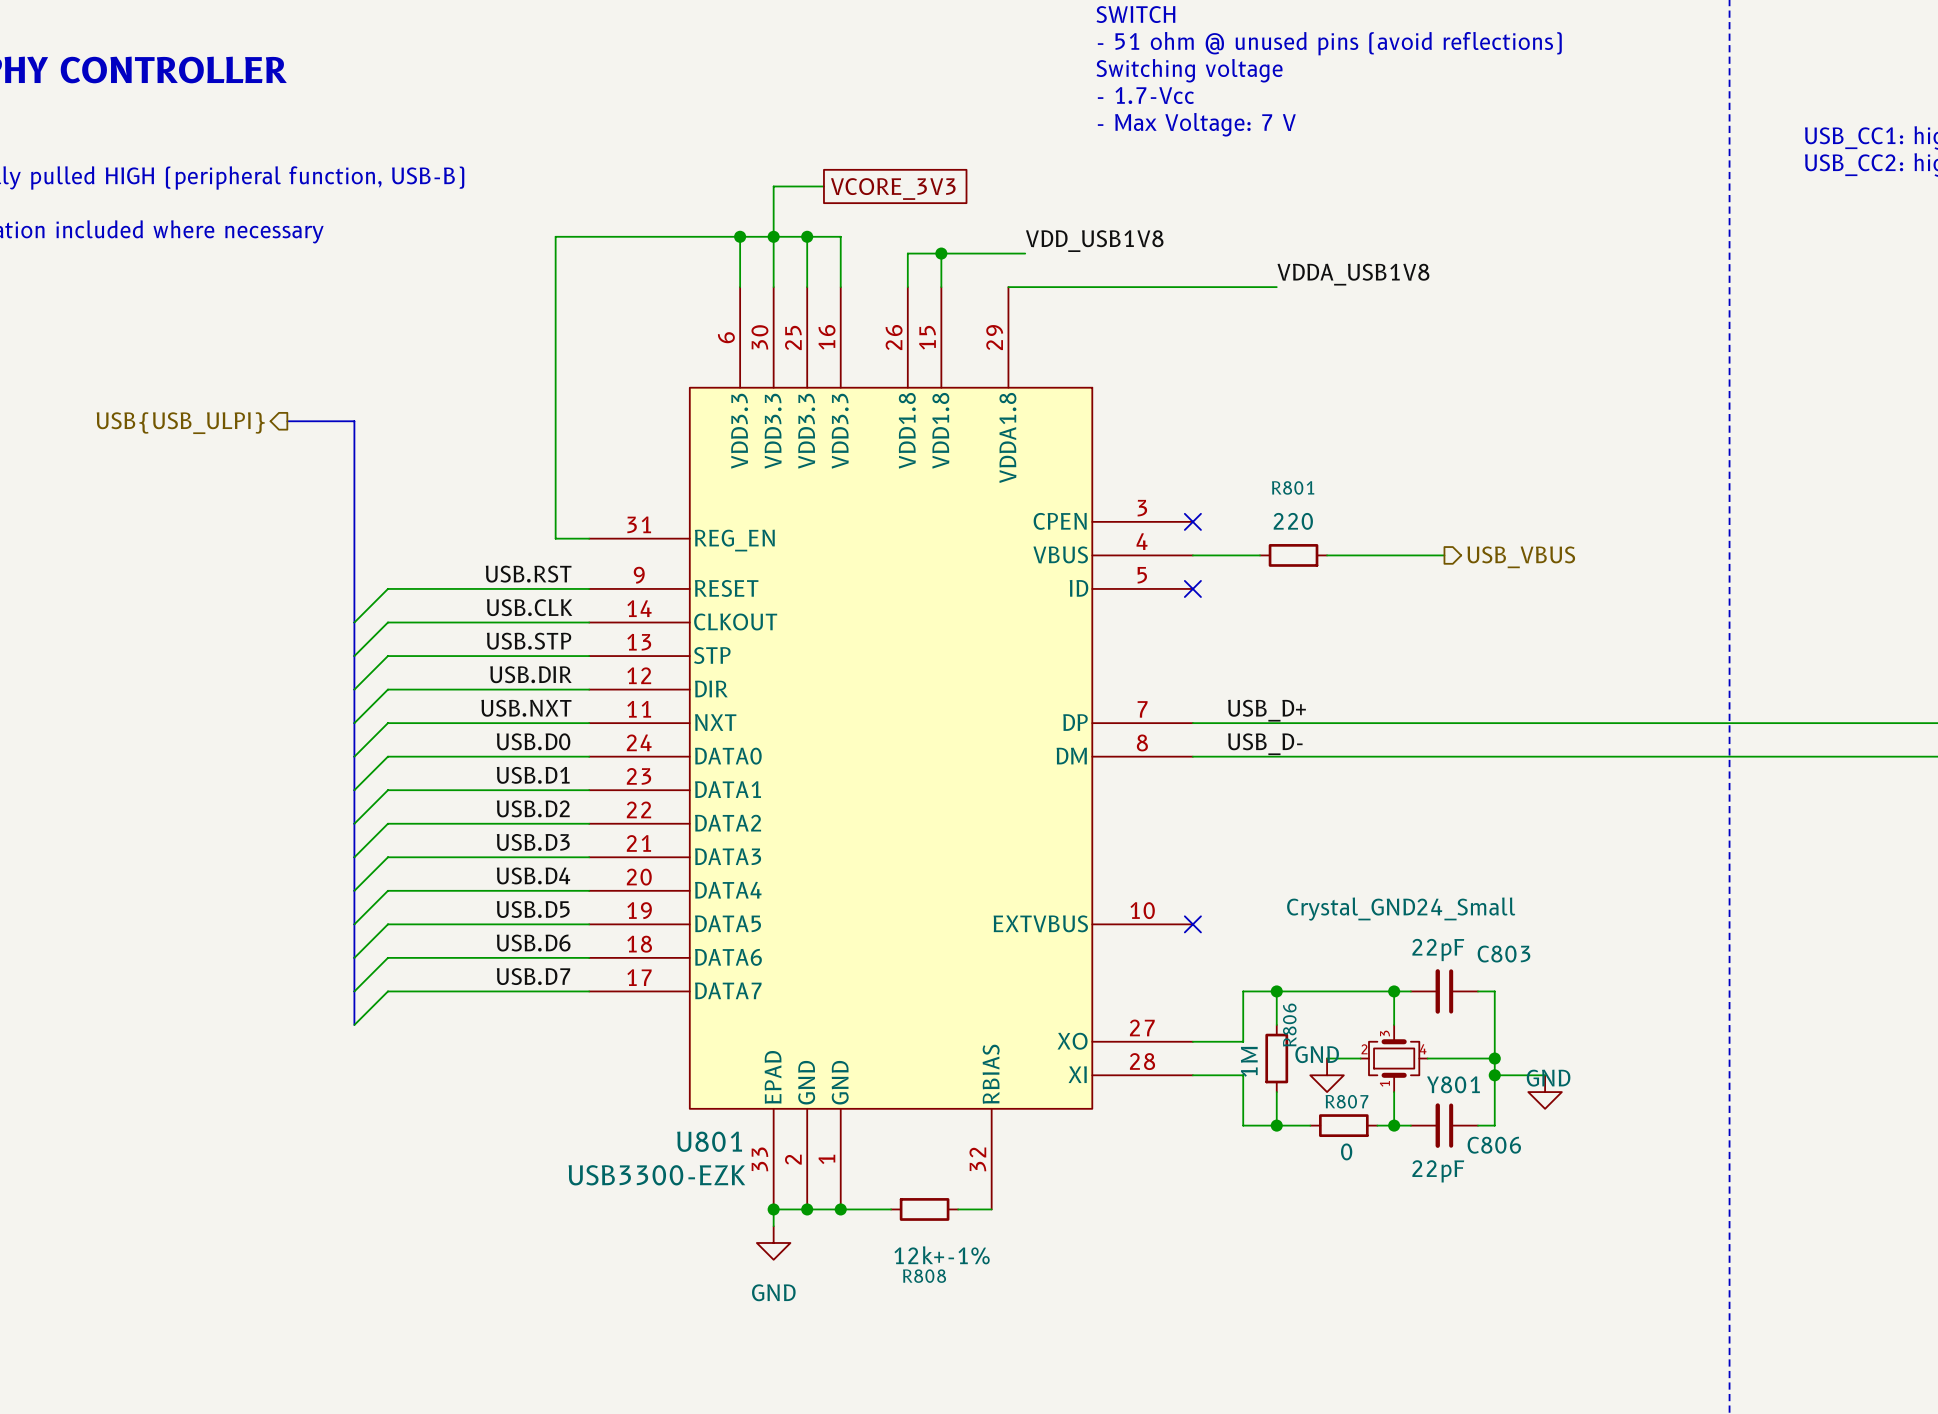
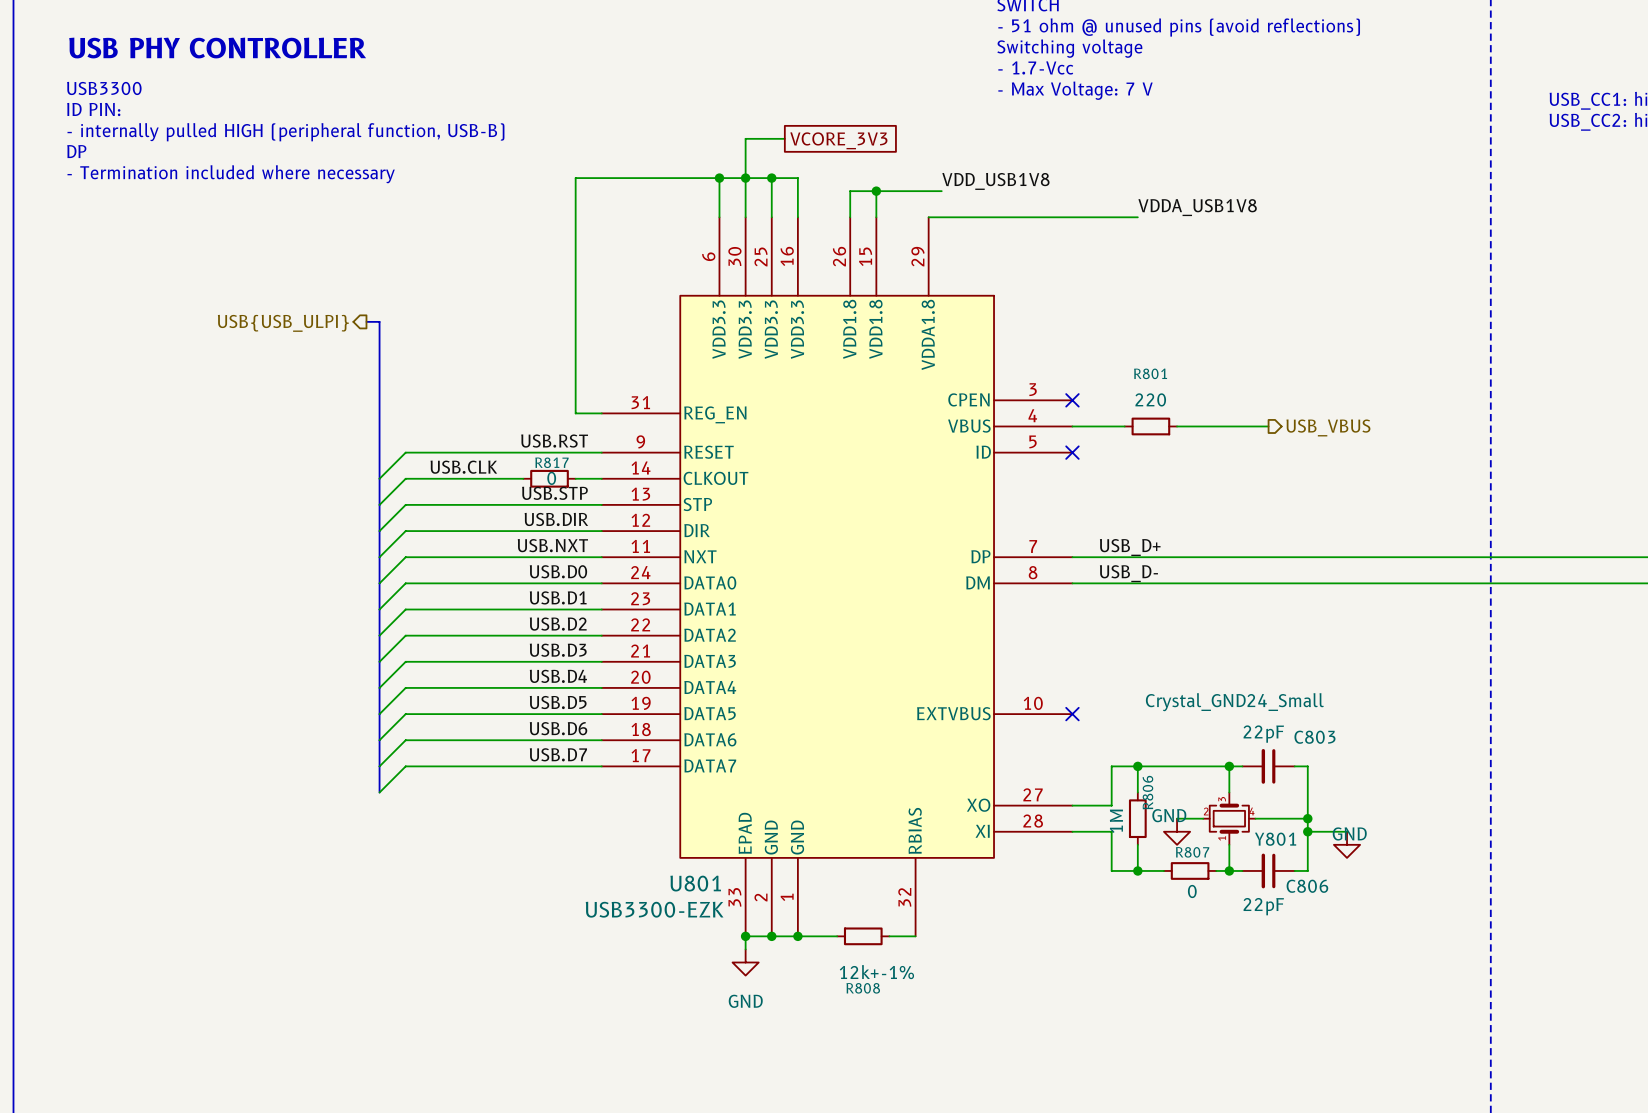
bus: (304, 421) (354, 421) (354, 1024) -> (379, 321) (379, 792)
wire: (387, 588) (354, 622) -> (444, 452) (405, 452) (379, 478)
label position: USB.CLK (529, 607) -> USB.CLK (463, 467)
wire: (387, 622) (354, 656) -> (444, 478) (405, 478) (379, 504)
wire: (488, 622) (555, 622) -> none
R817: none -> 0 (549, 478)
wire: (387, 656) (354, 689) -> (444, 504) (405, 504) (379, 531)
wire: (387, 689) (354, 723) -> (444, 531) (405, 531) (379, 557)
wire: (387, 723) (354, 756) -> (444, 557) (405, 557) (379, 583)
wire: (387, 756) (354, 790) -> (444, 583) (405, 583) (379, 609)
wire: (387, 790) (354, 823) -> (444, 609) (405, 609) (379, 635)
wire: (387, 823) (354, 857) -> (444, 635) (405, 635) (379, 661)
wire: (387, 857) (354, 890) -> (444, 661) (405, 661) (379, 687)
wire: (387, 890) (354, 924) -> (444, 687) (405, 687) (379, 714)
wire: (387, 924) (354, 957) -> (444, 714) (405, 714) (379, 740)
wire: (387, 957) (354, 991) -> (444, 740) (405, 740) (379, 766)
wire: (387, 991) (354, 1024) -> (444, 766) (405, 766) (379, 792)

